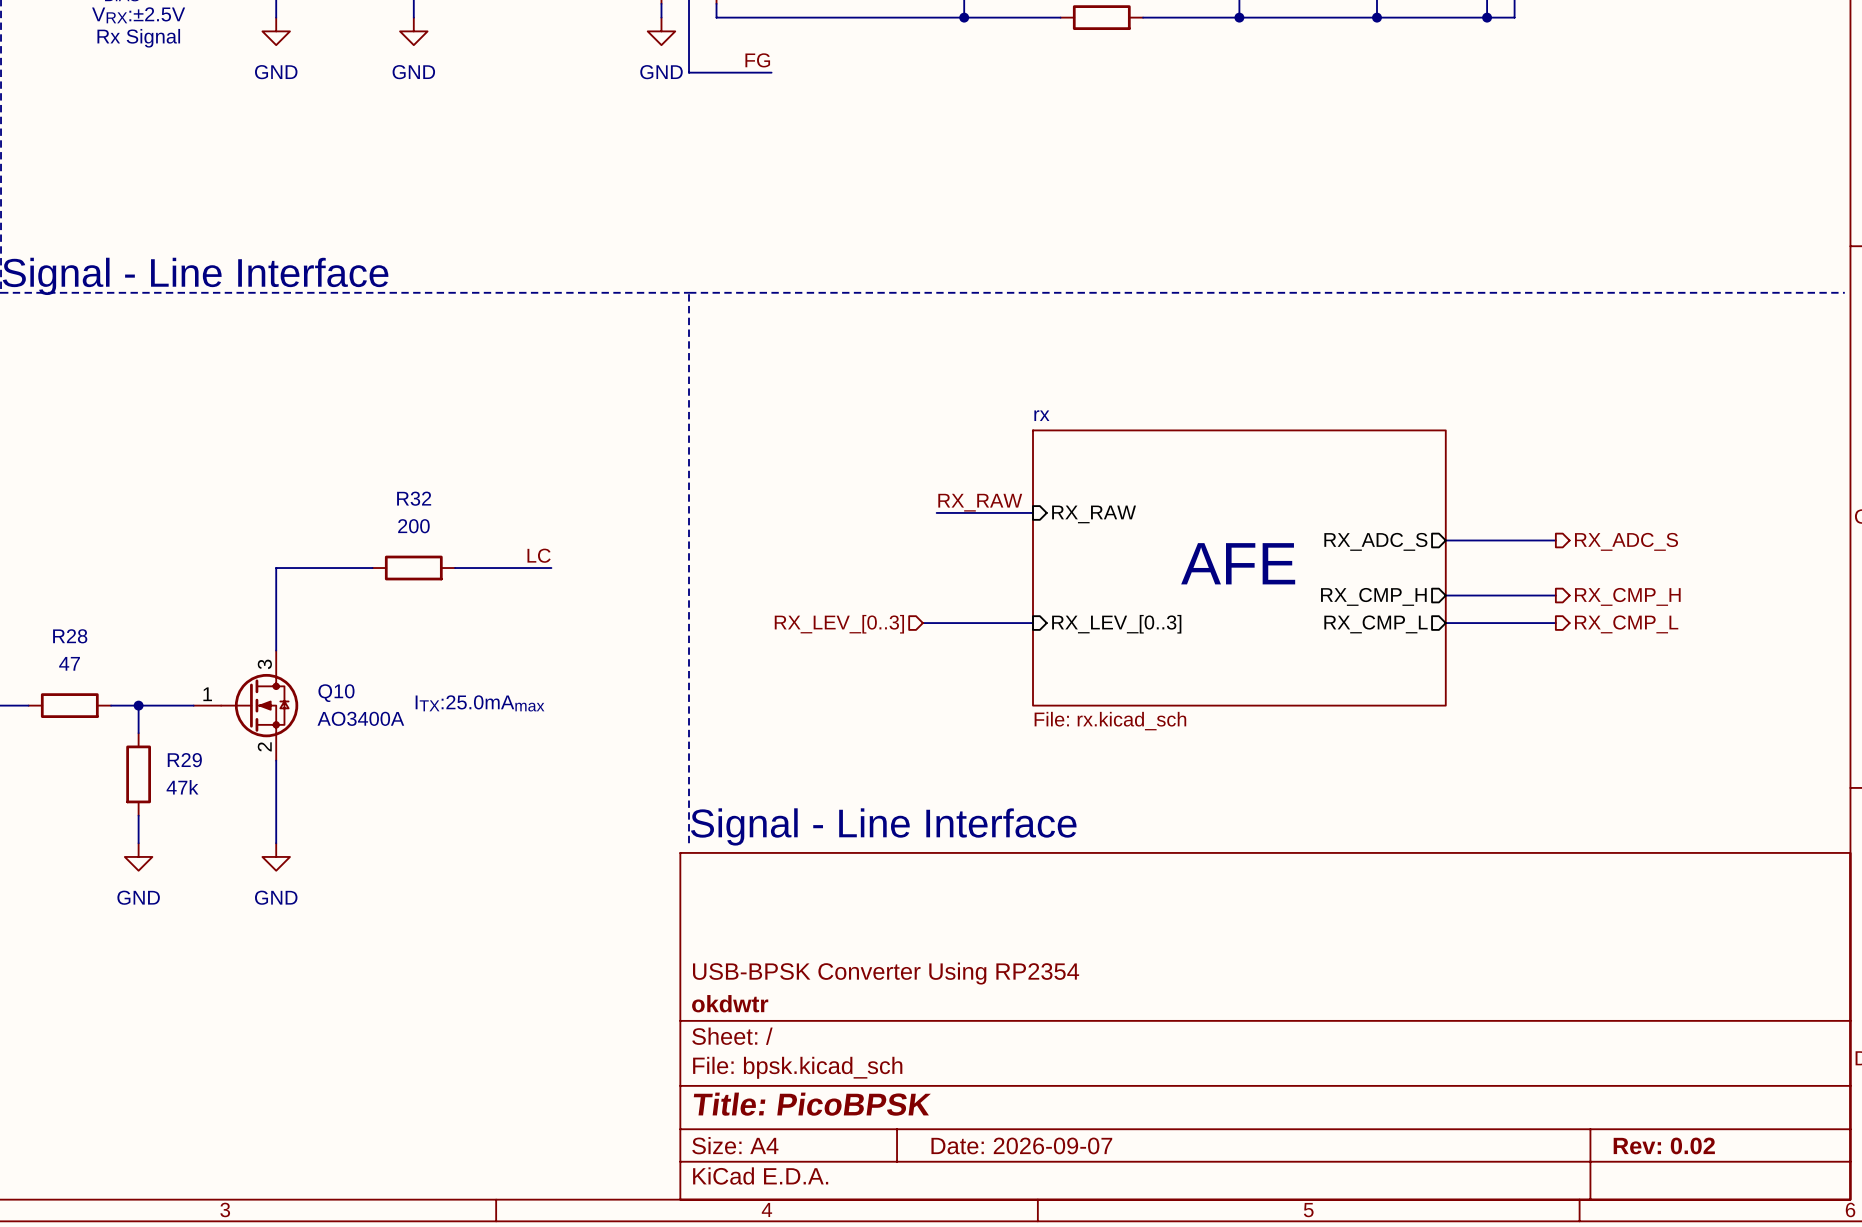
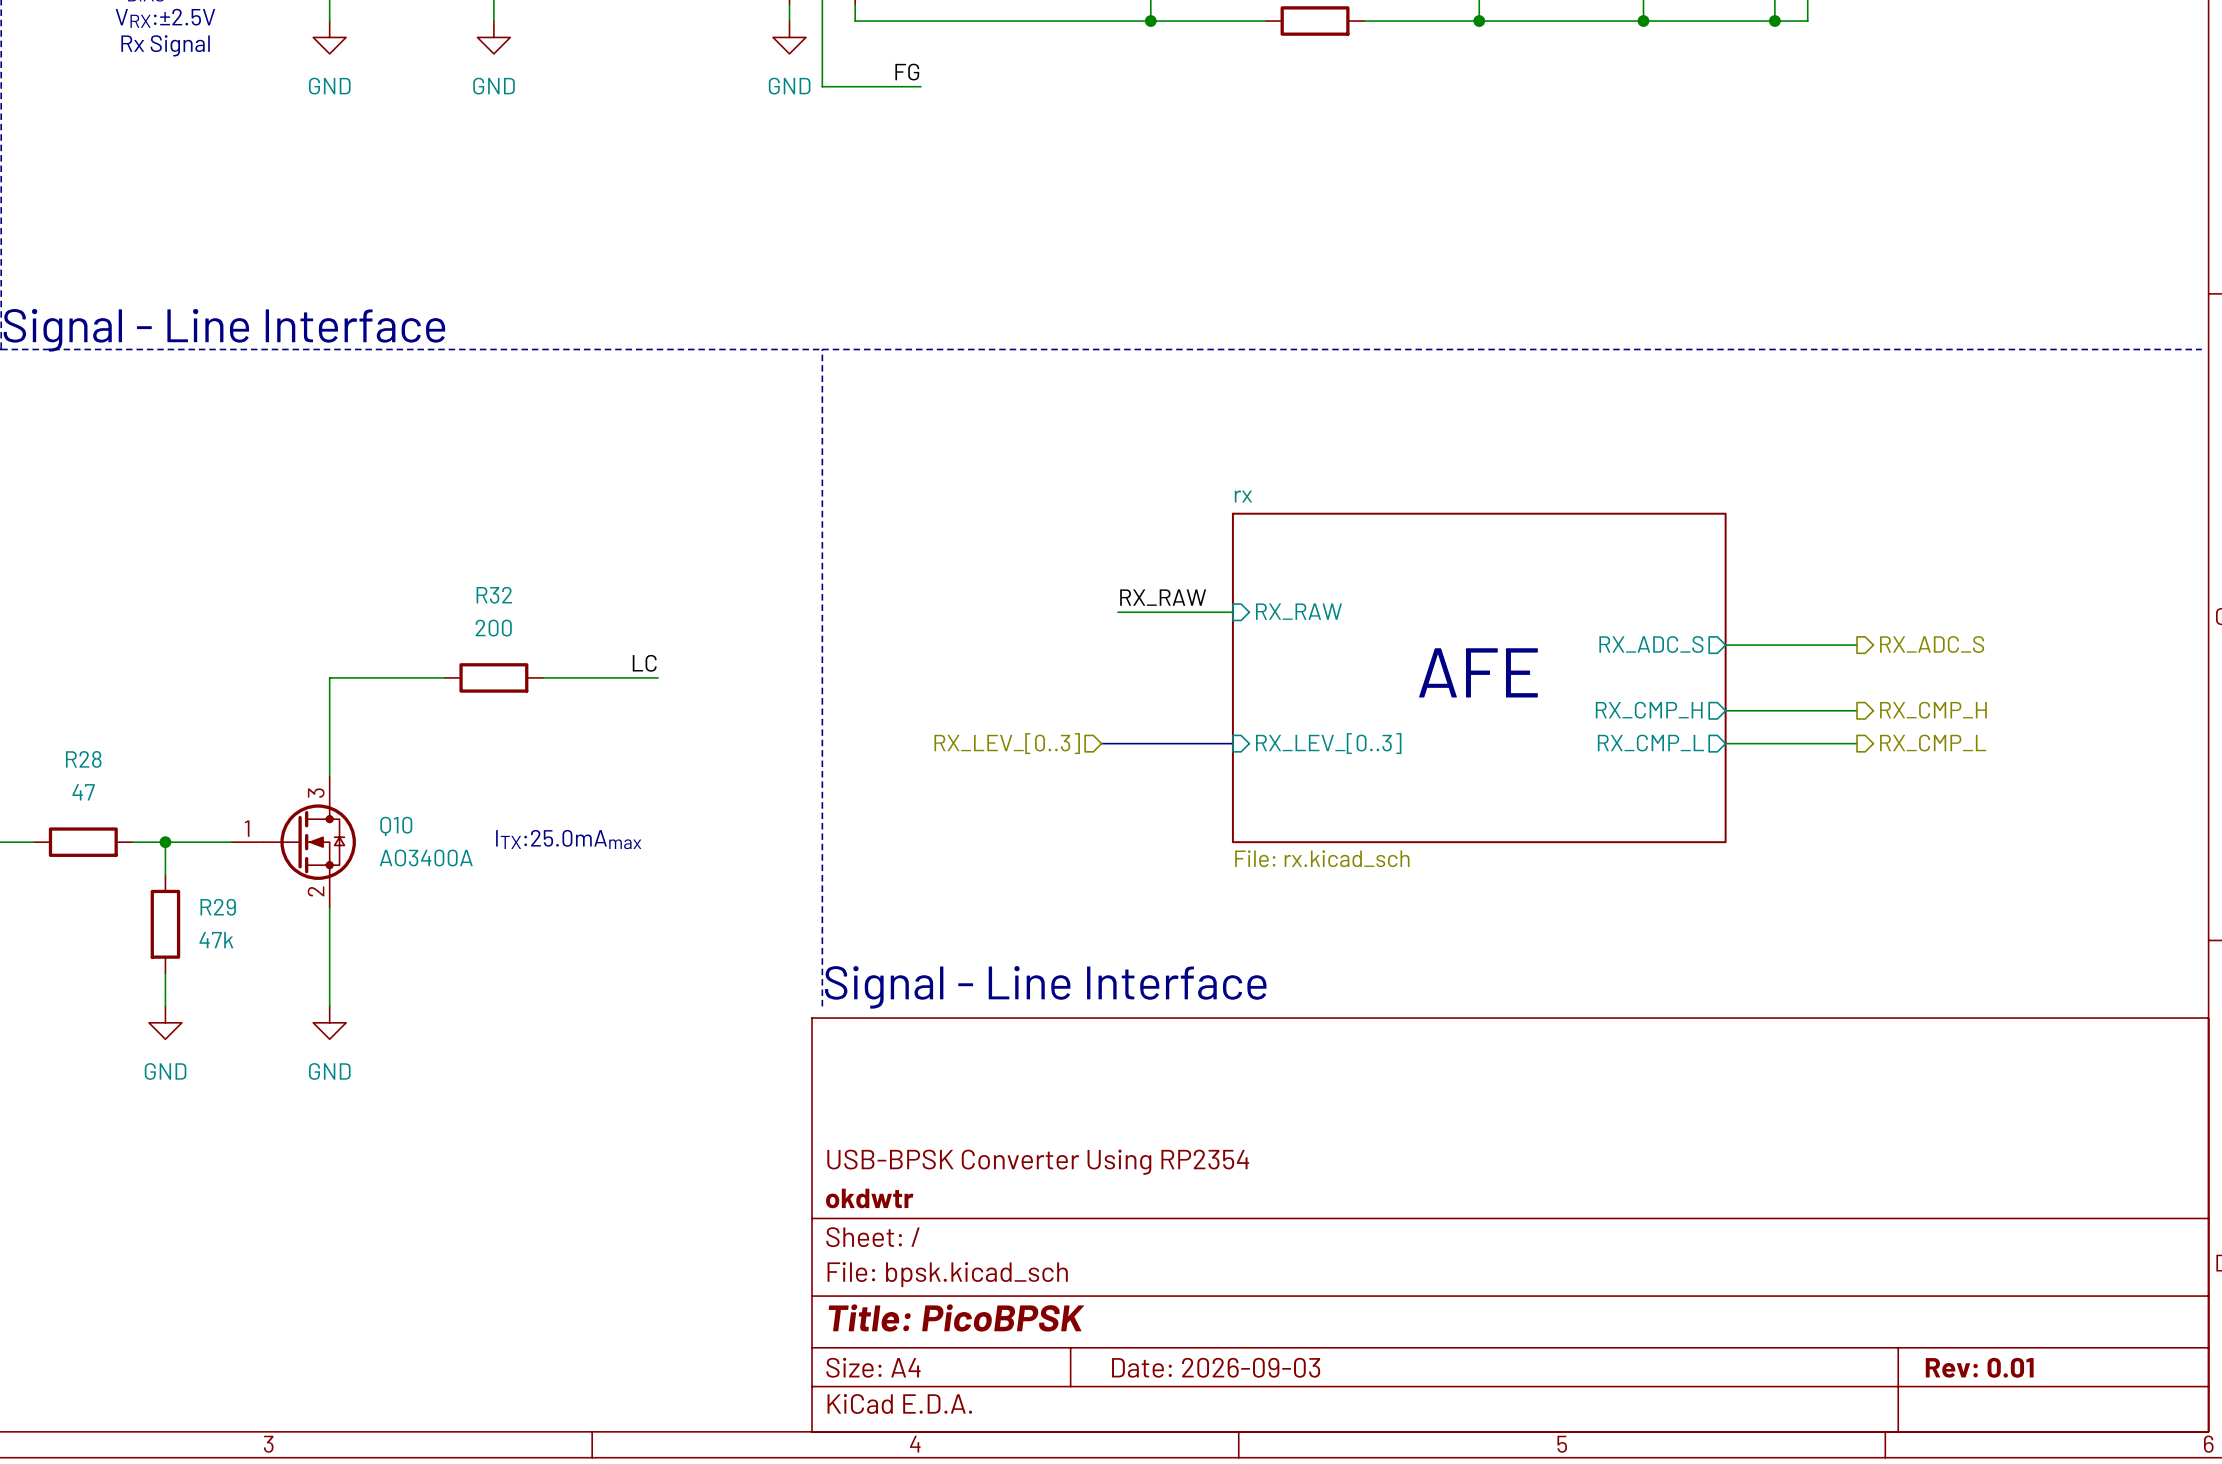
title block: Date: 2026-09-07 (1021, 1145) -> Date: 2026-09-03 (1216, 1367)
title block: Rev: 0.02 (1664, 1145) -> Rev: 0.01 (1979, 1367)

